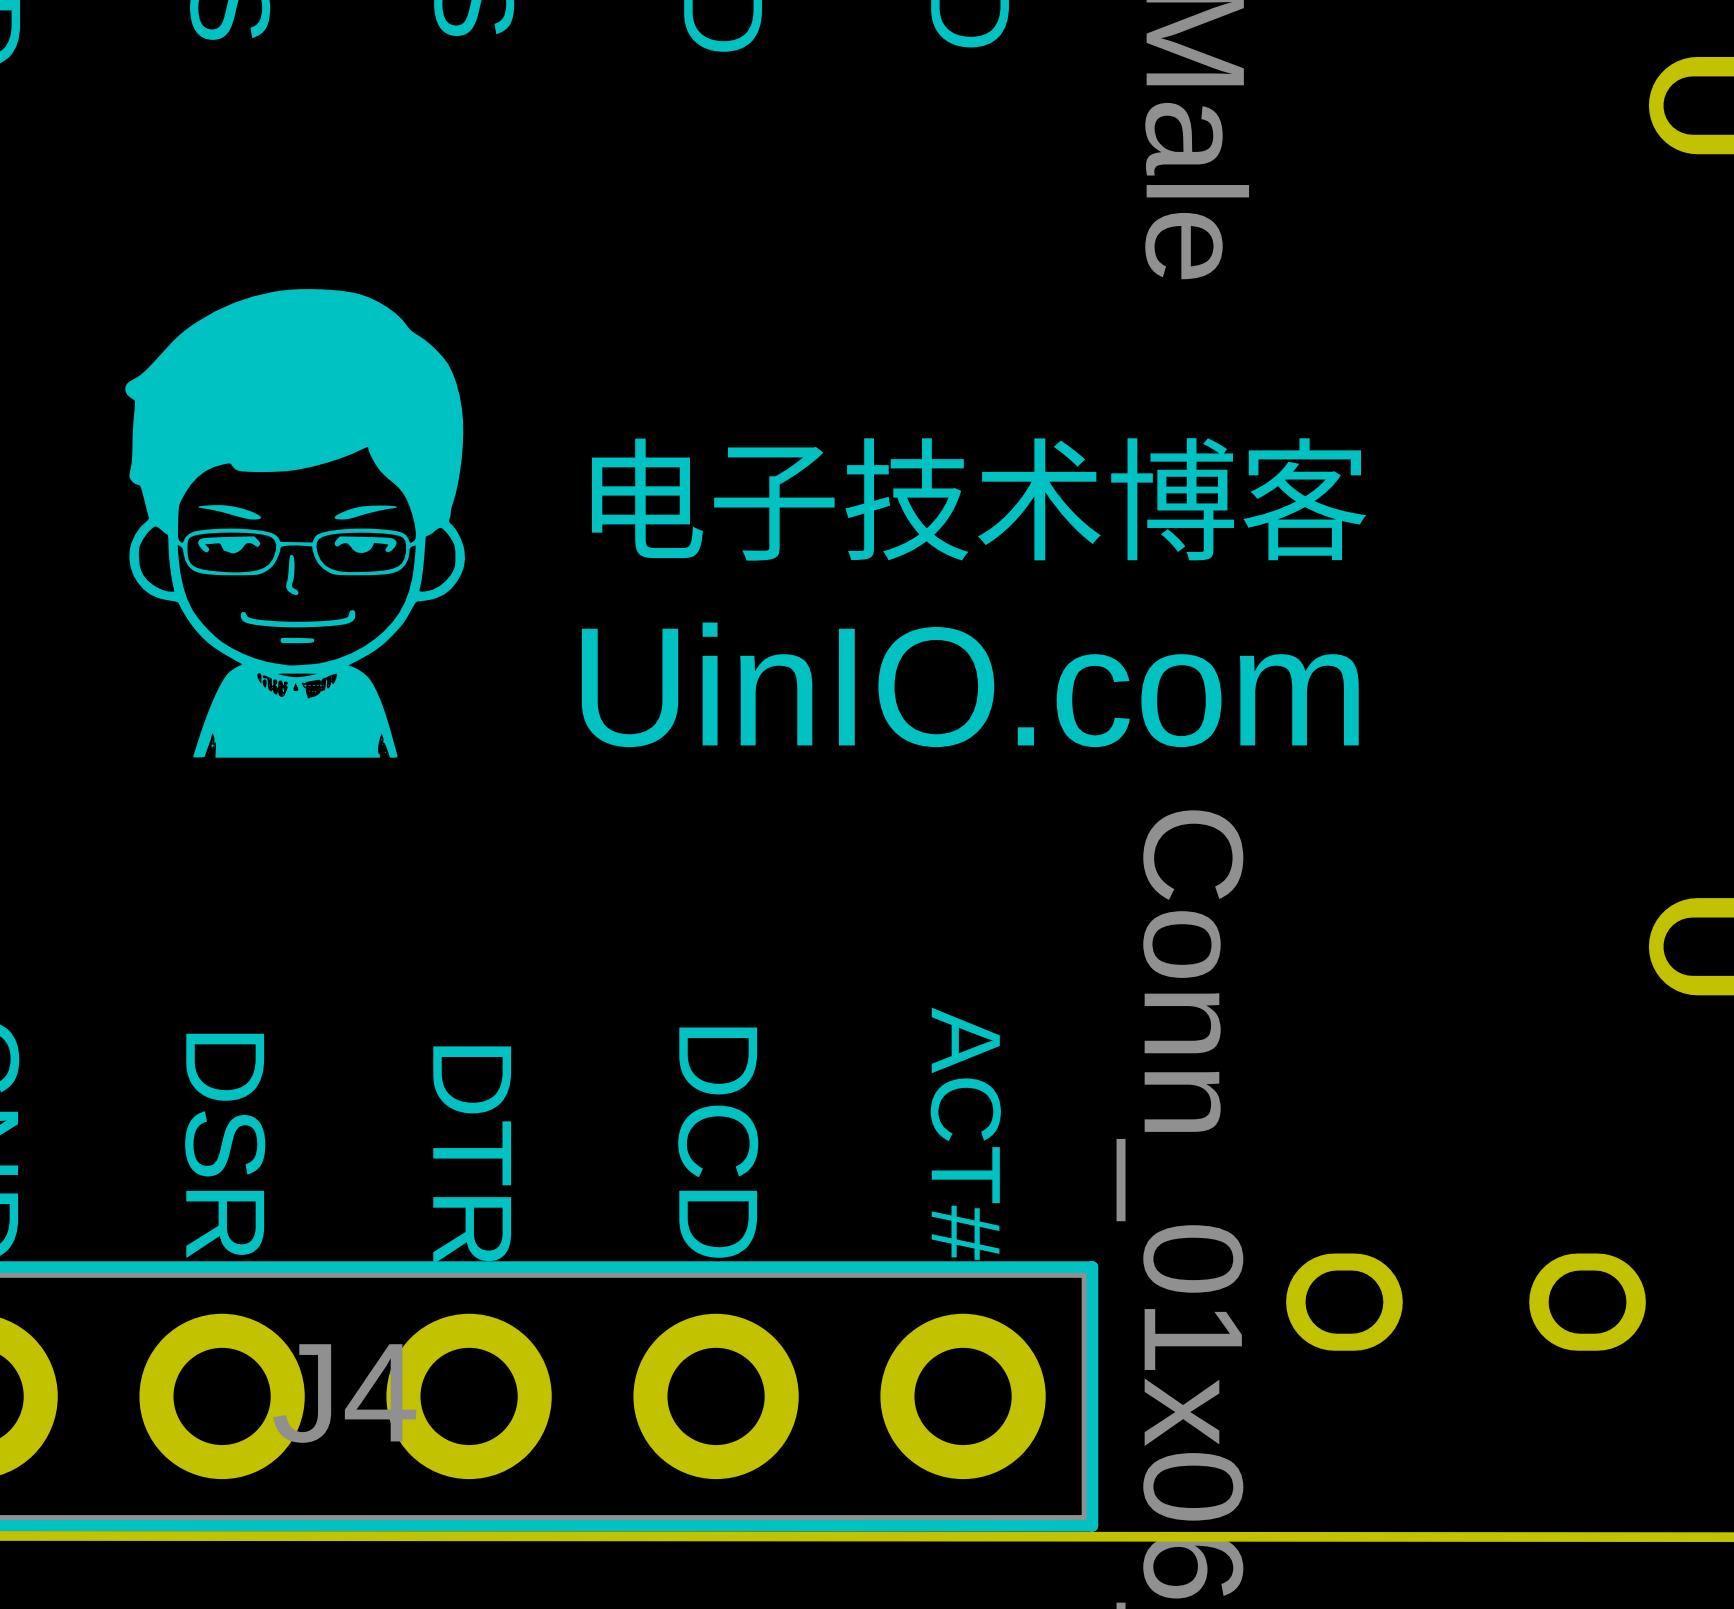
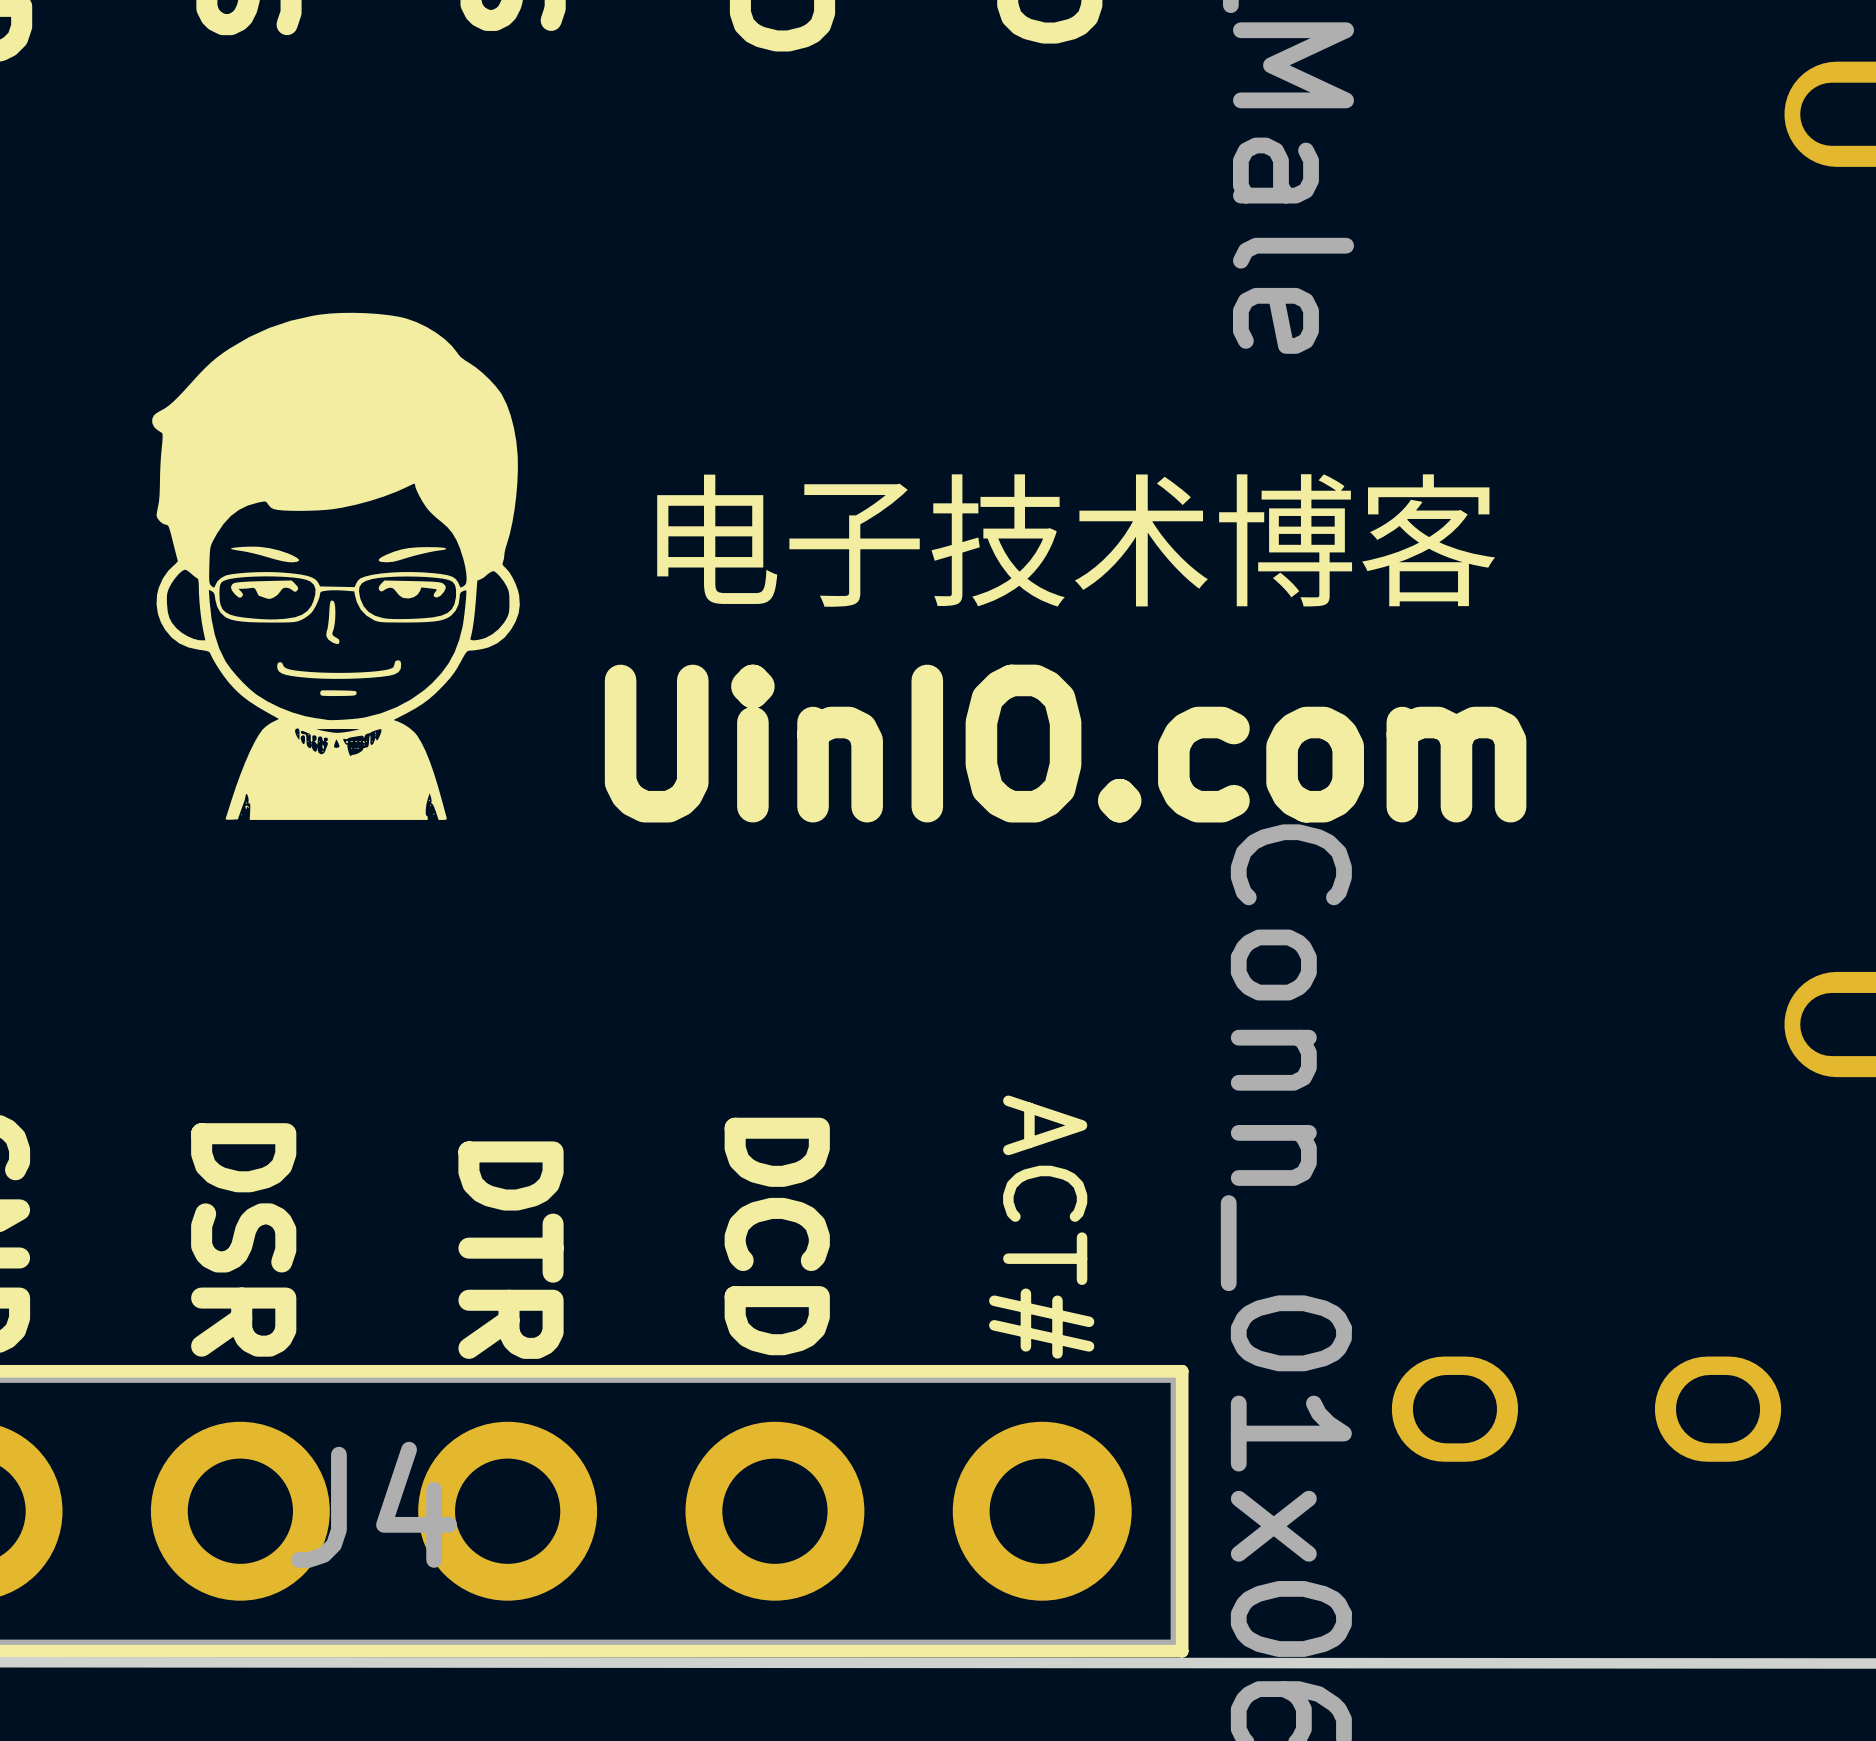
text position: 电子技术博客 (979, 499) -> 电子技术博客 (1076, 540)
drawing position: (295, 523) -> (336, 566)
text position: UinIO.com (970, 684) -> UinIO.com (1065, 743)

